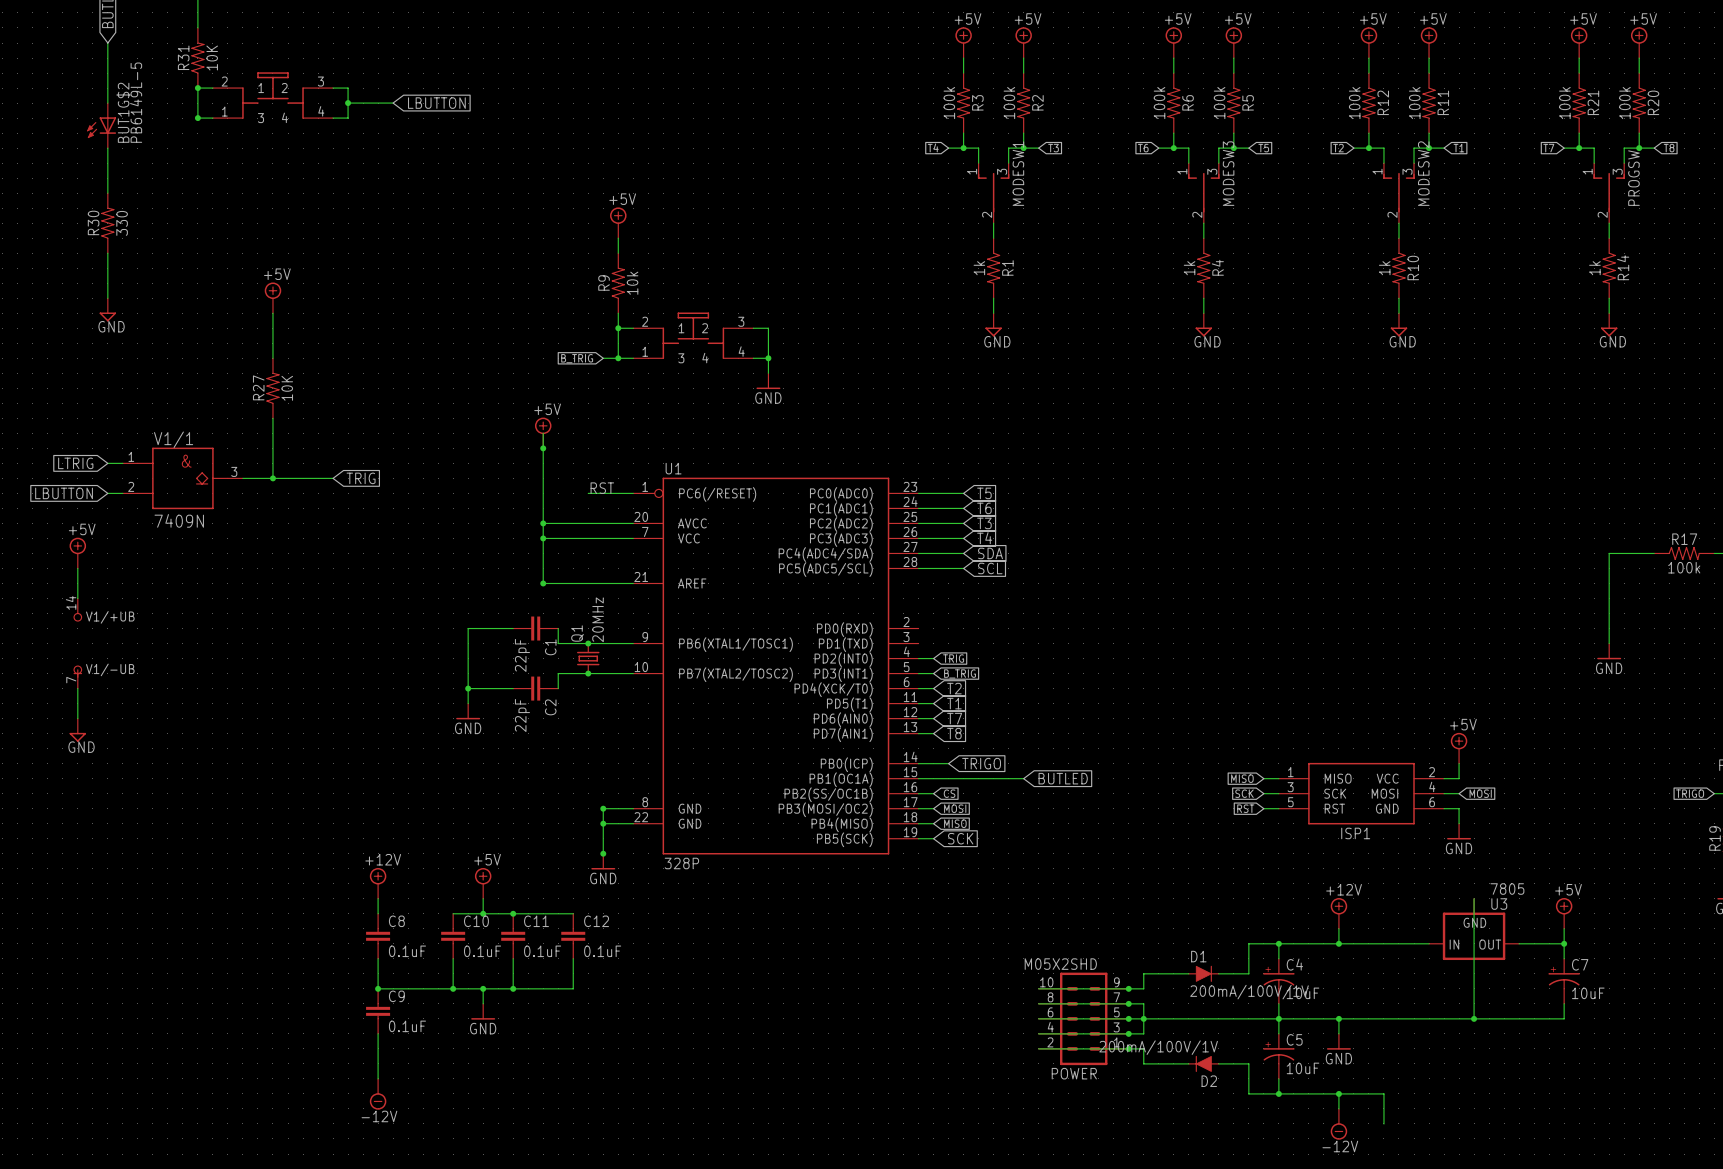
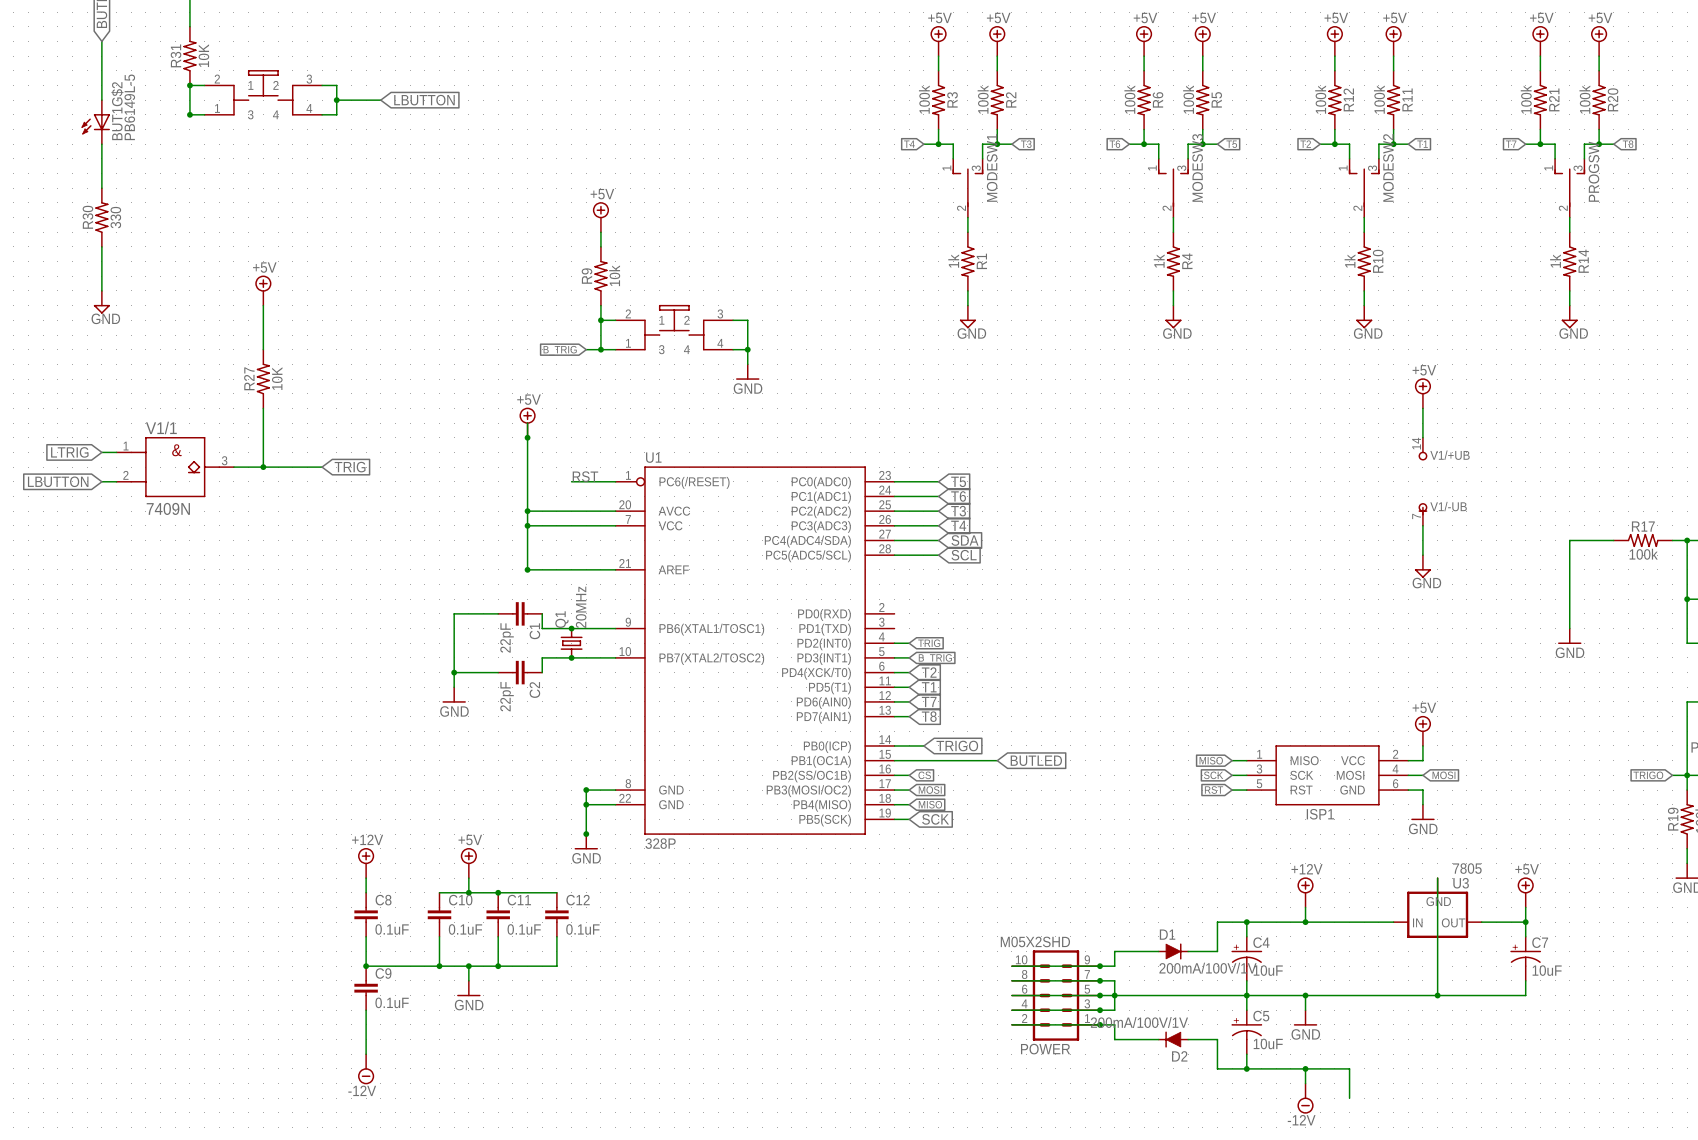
power symbol: none -> +5V (1422, 393)
wire: none -> (1422, 408) (1422, 437)
wire: none -> (1422, 525) (1422, 555)
power symbol: +5V (77, 553) -> none
wire: (77, 568) (77, 598) -> none
power symbol: none -> GND (1422, 566)
V1/+UB position: (77, 609) -> (1422, 448)
V1/-UB position: (77, 677) -> (1422, 514)
wire: (77, 688) (77, 718) -> none
power symbol: GND (77, 730) -> none

